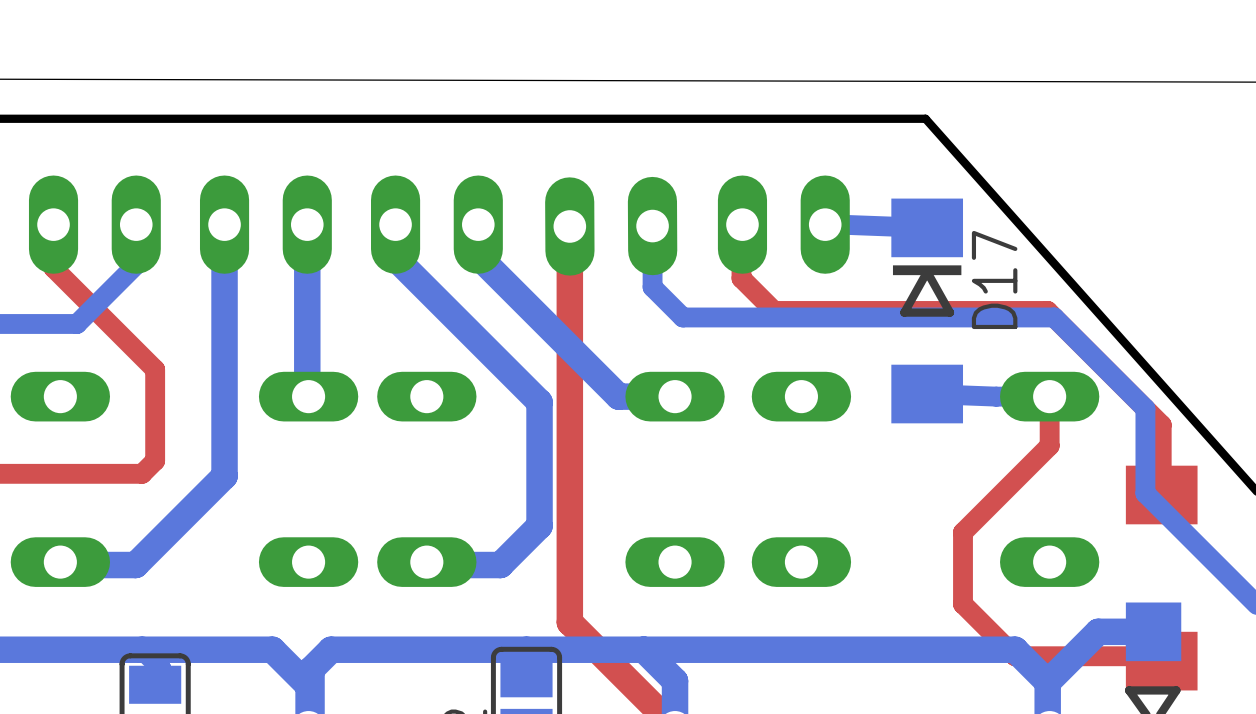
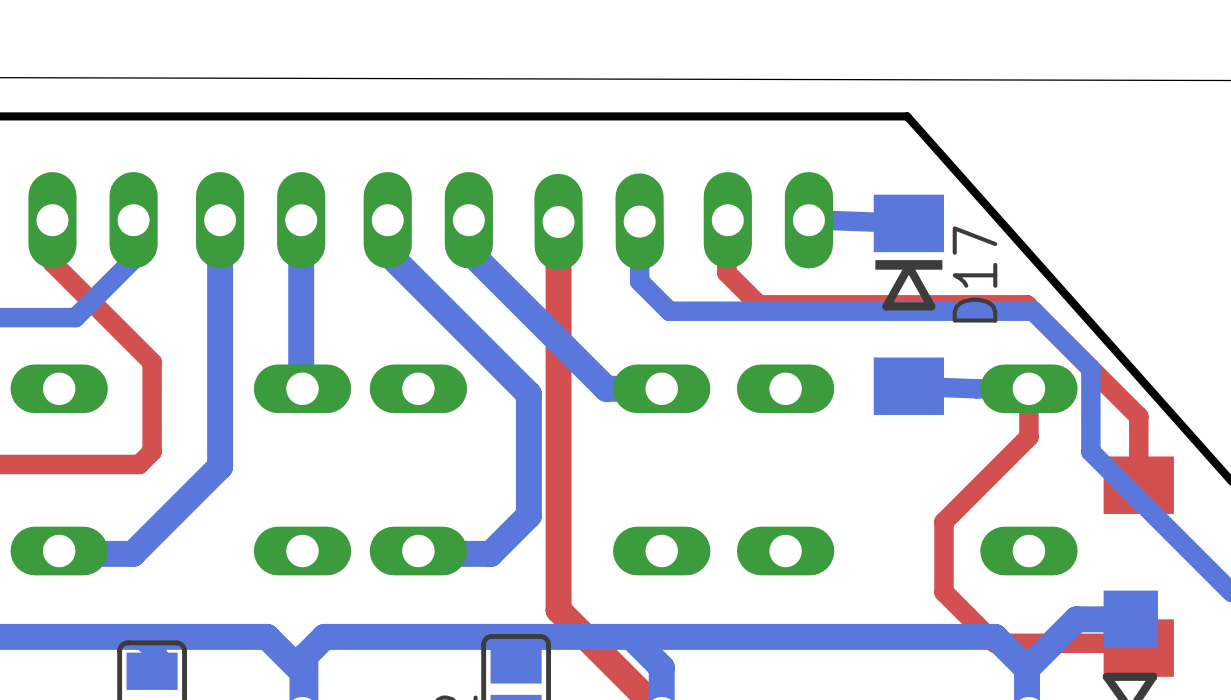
bottom track: (1112, 376) (1145, 408) (1145, 493) -> (1090, 368) (1090, 451) (1122, 483)

